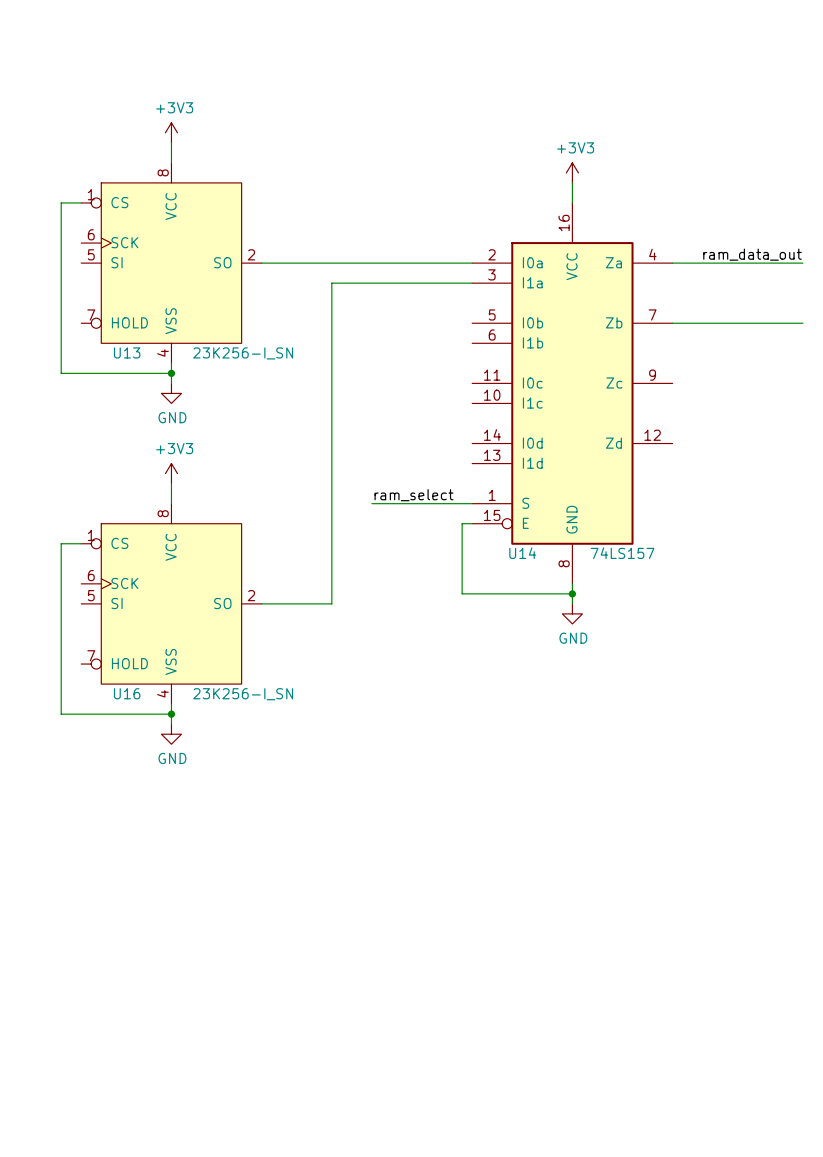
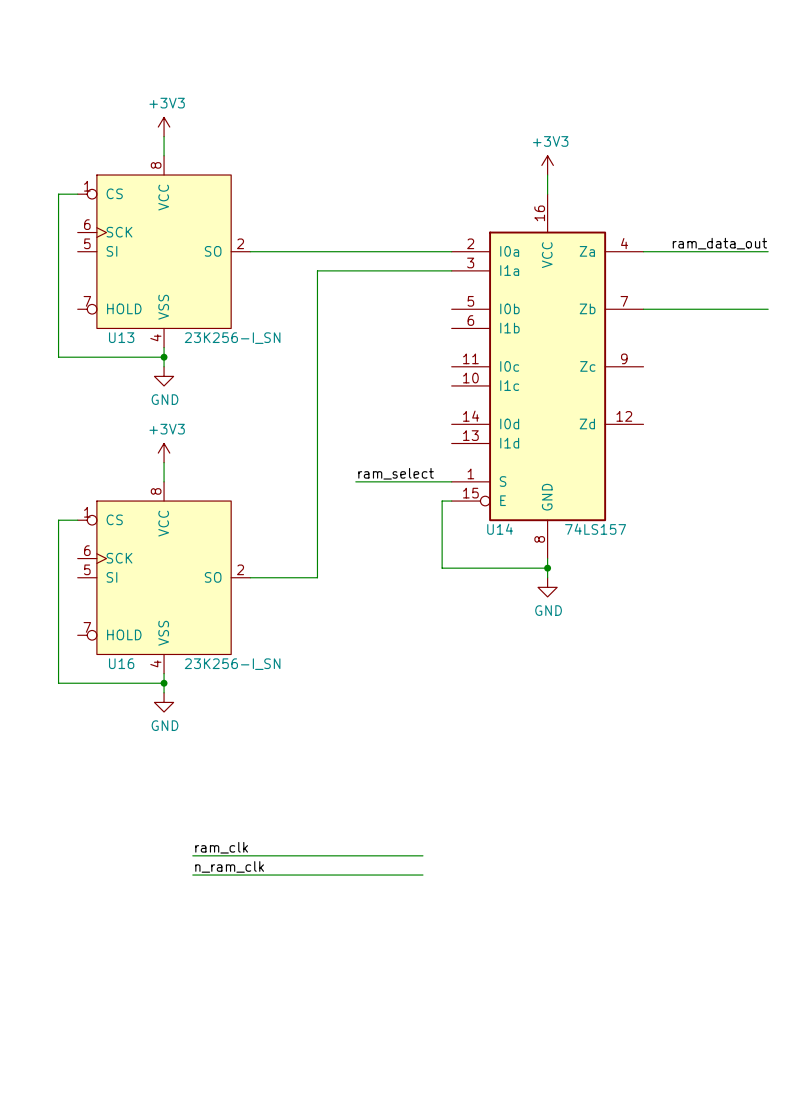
label: none -> ram_clk (221, 847)
wire: none -> (192, 855) (422, 855)
label: none -> n_ram_clk (229, 866)
wire: none -> (192, 875) (422, 875)

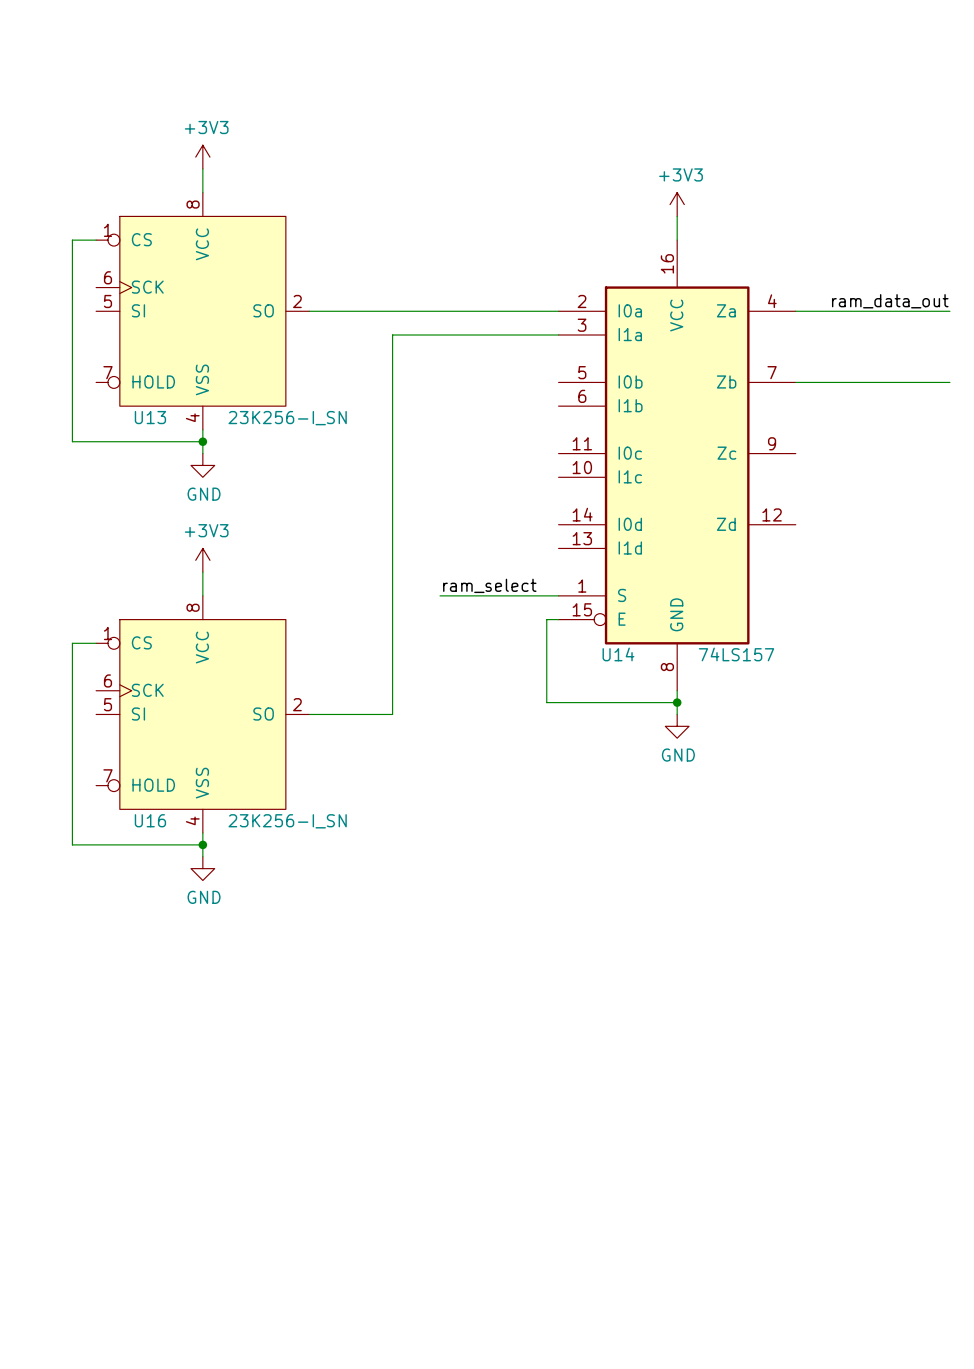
label: ram_clk (221, 847) -> none
wire: (192, 855) (422, 855) -> none
label: n_ram_clk (229, 866) -> none
wire: (192, 875) (422, 875) -> none

